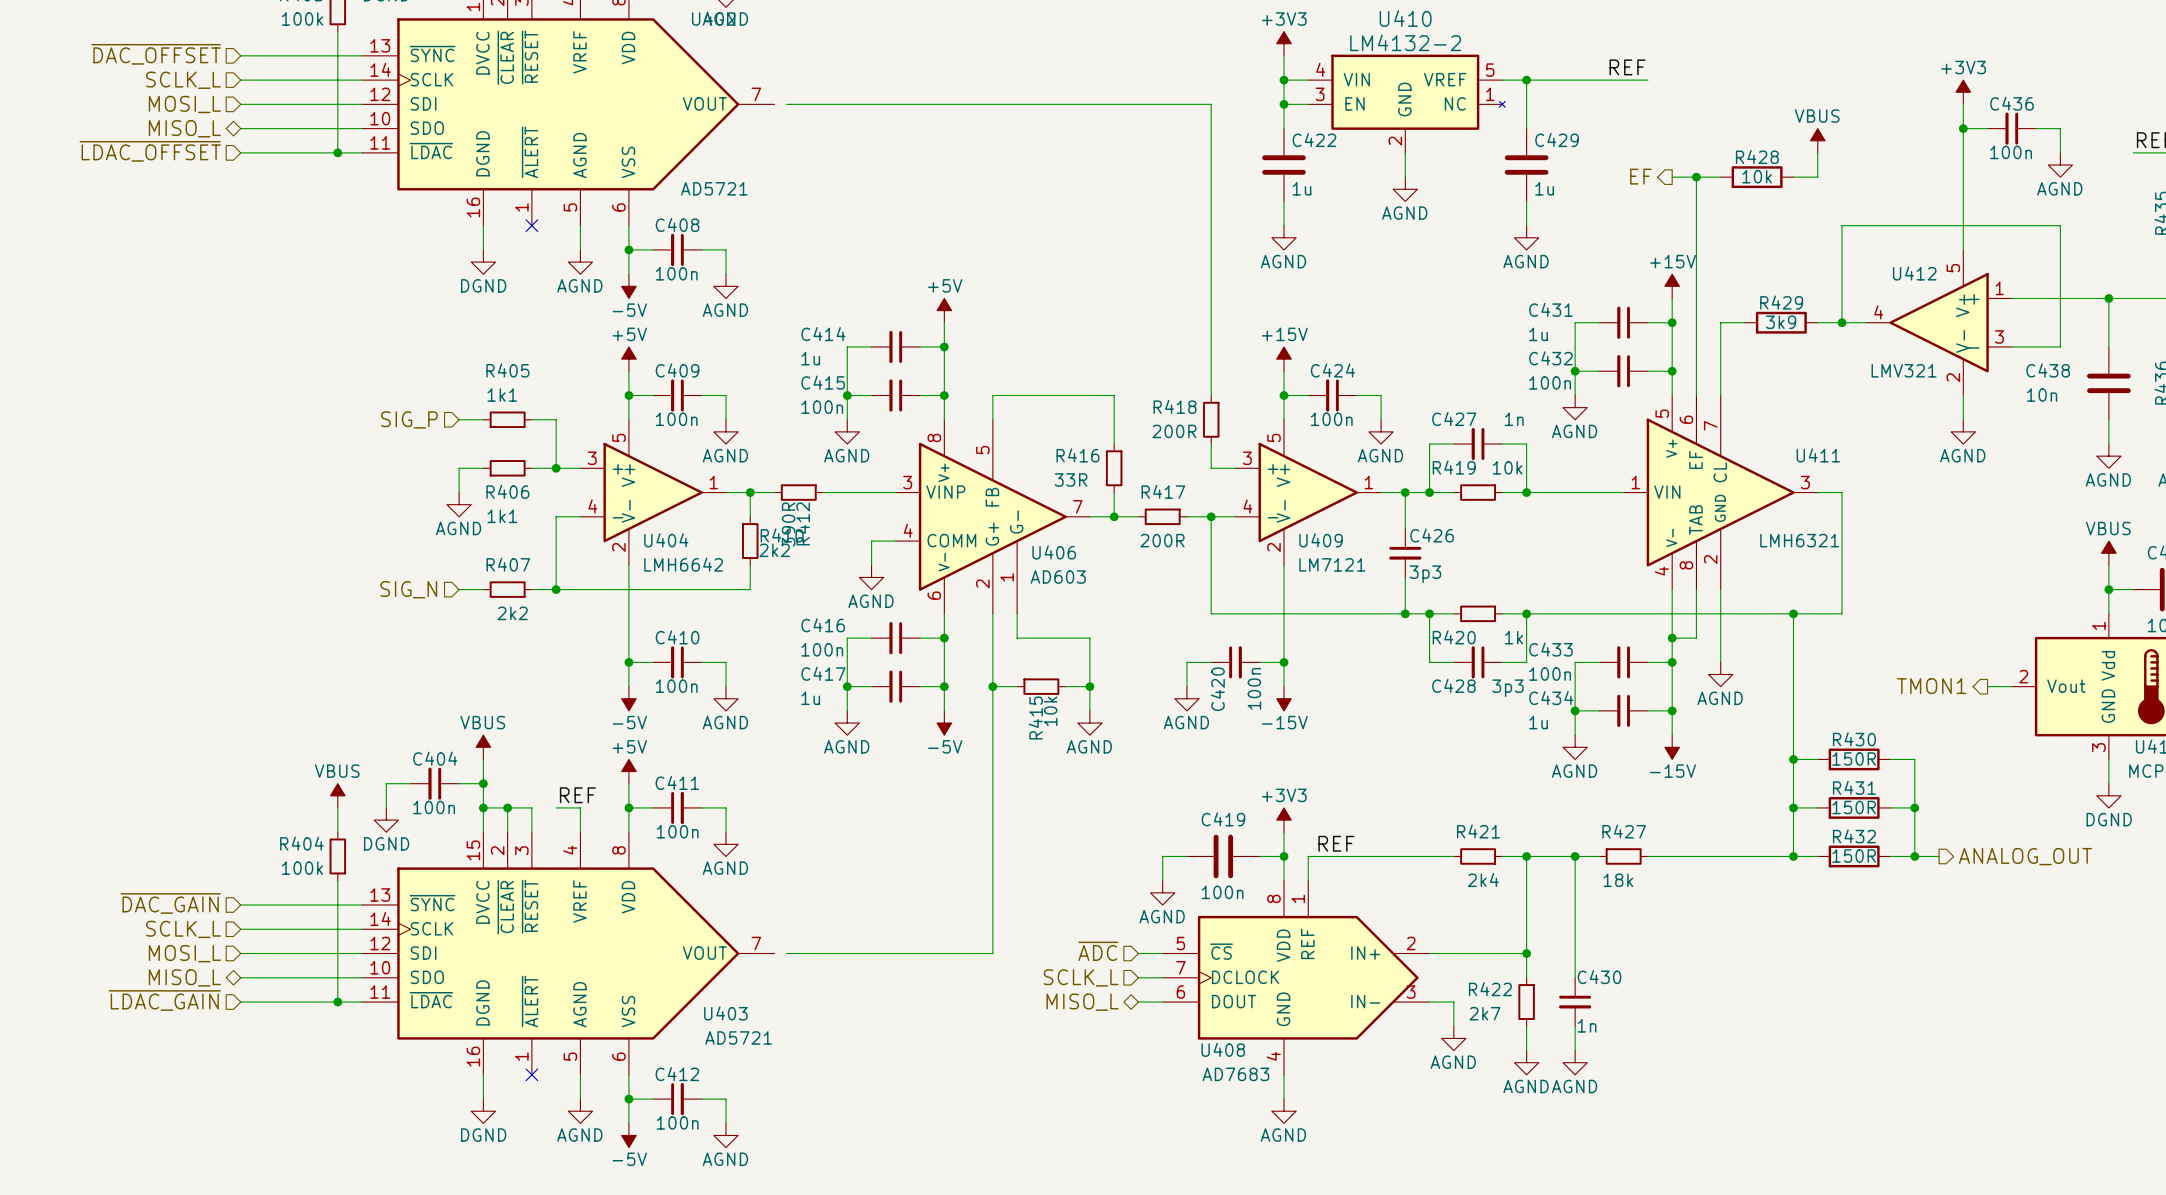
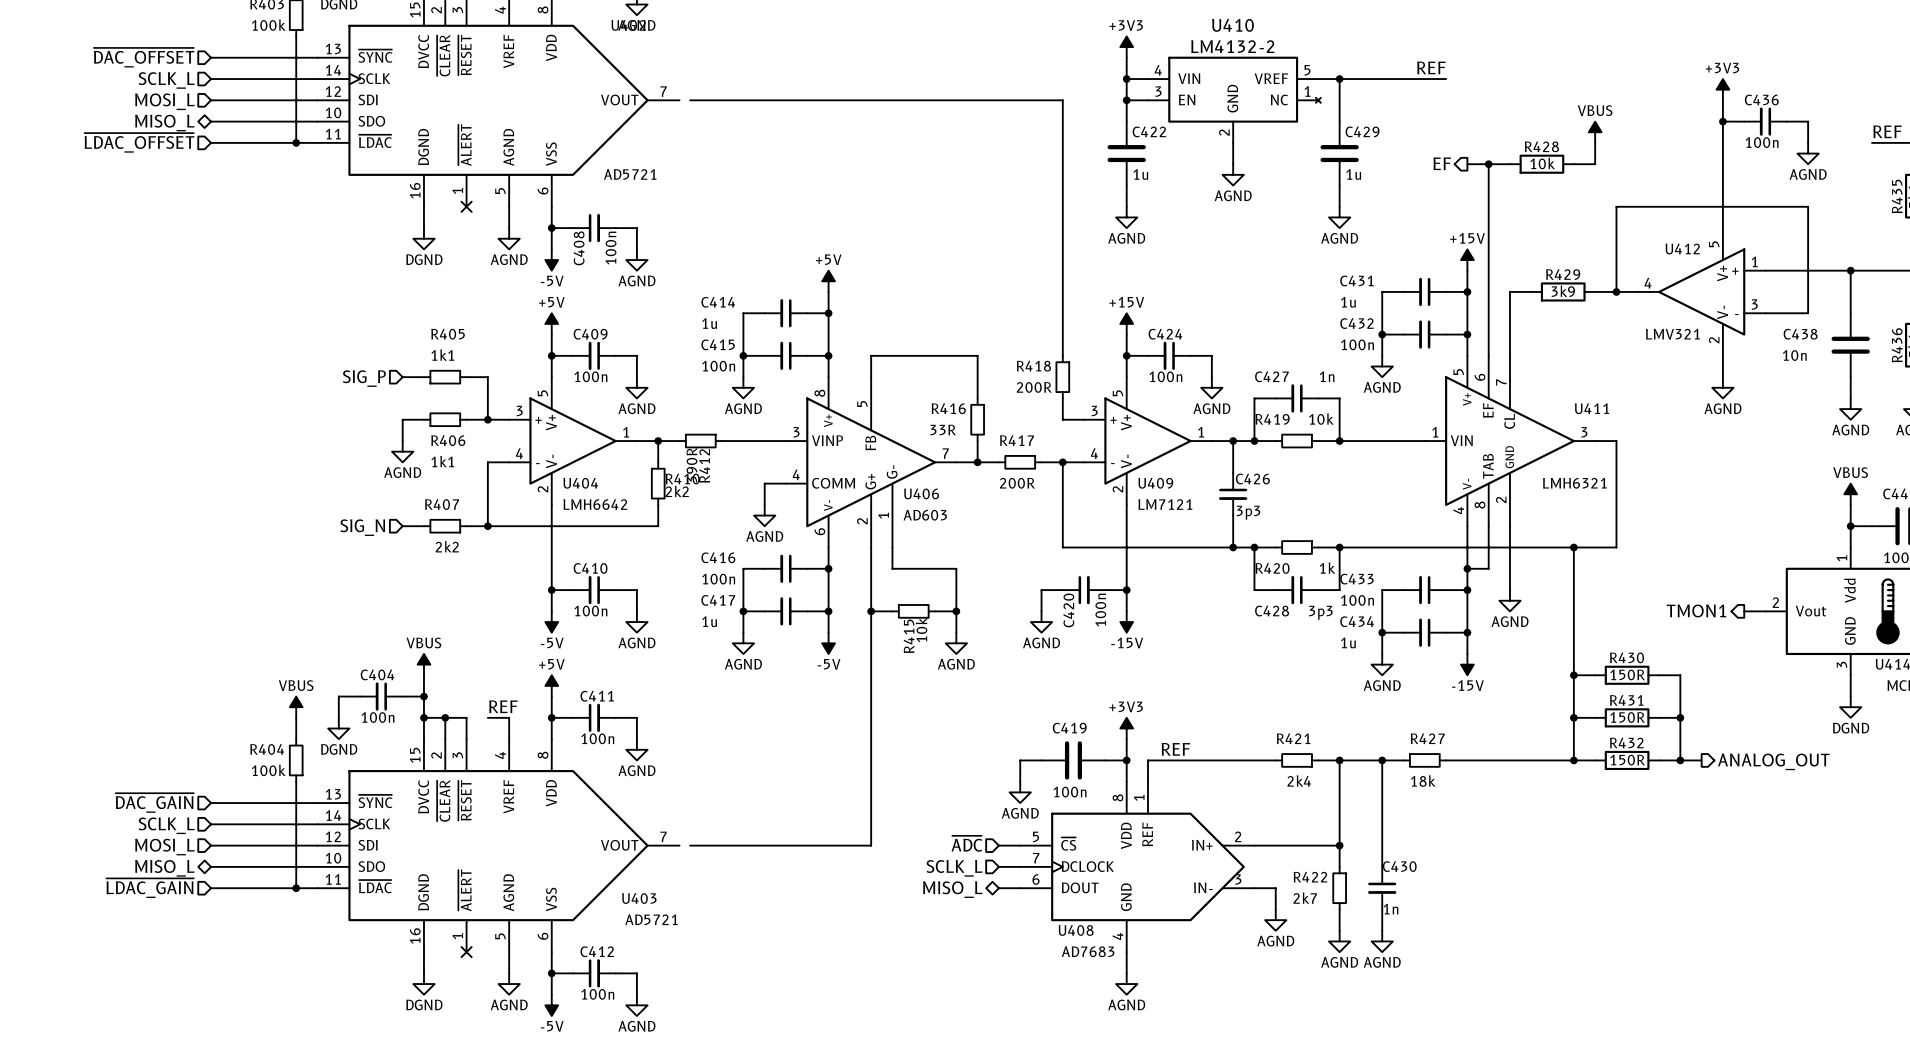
C408 rotation: 0° (677, 249) -> 180° (594, 228)

